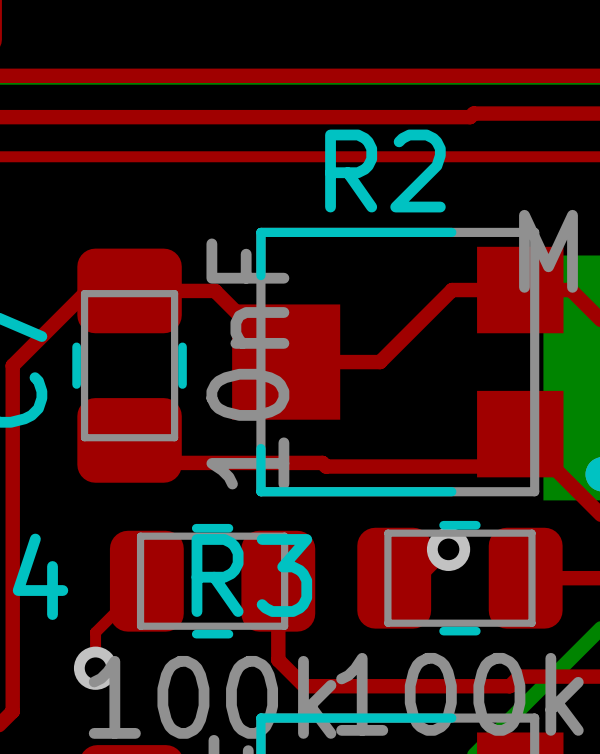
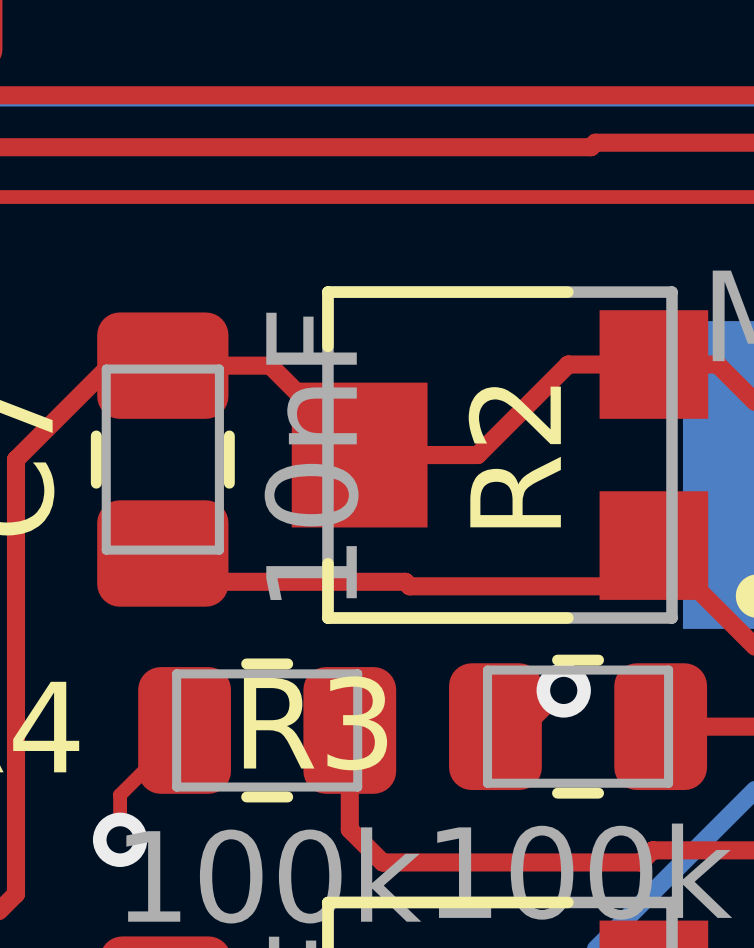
R2 name rotation: 0° (385, 171) -> 90° counterclockwise (514, 456)
R2 name position: R2 (385, 171) -> R2 (514, 456)

